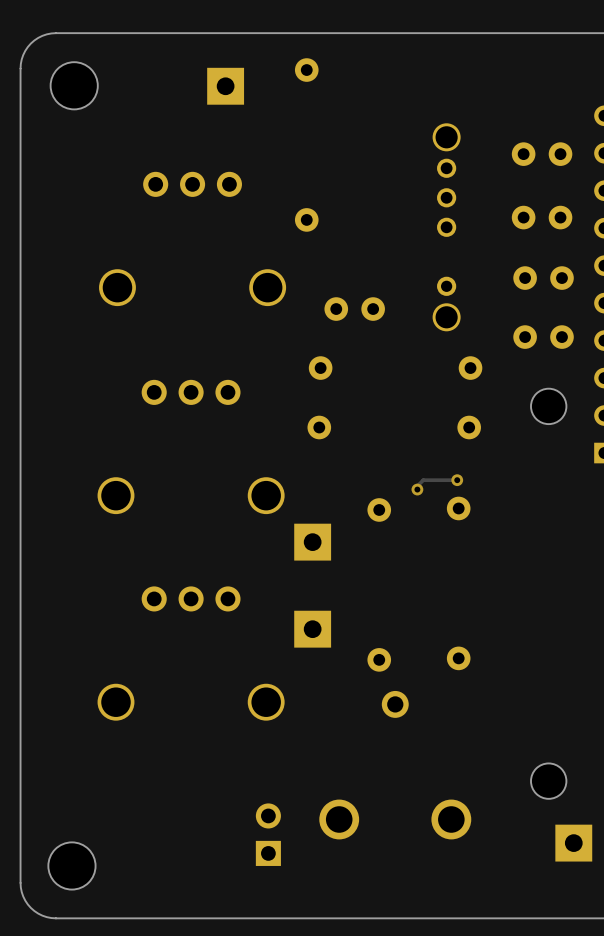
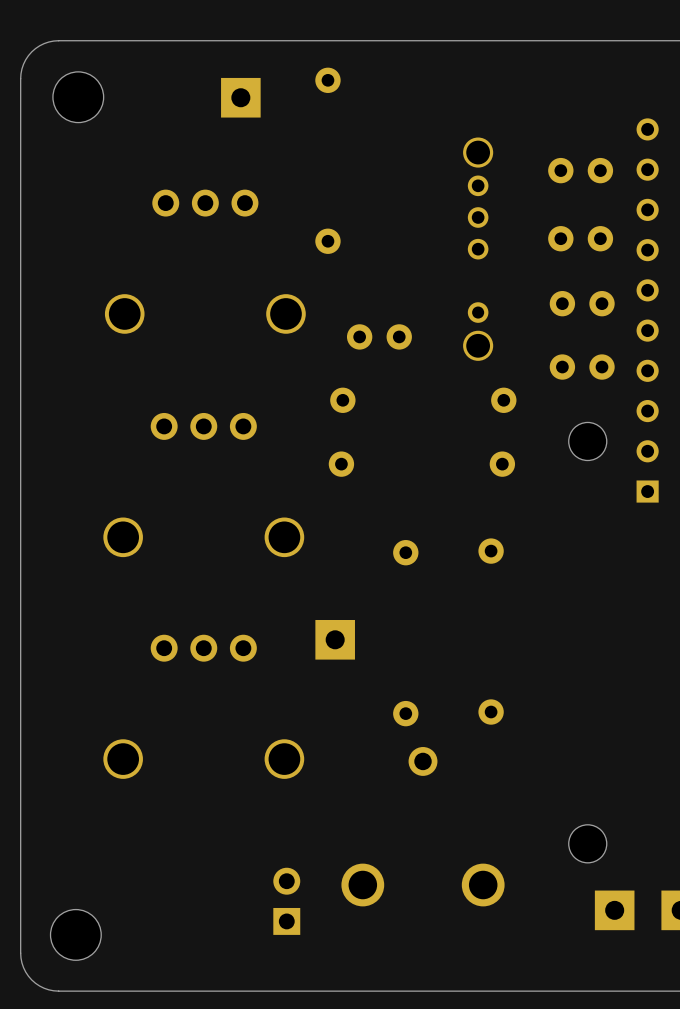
track: (457, 480) (423, 480) (417, 486) (417, 489) -> none
via: (457, 480) -> none
via: (417, 489) -> none
part: (312, 542) -> none
part: none -> (335, 639)
part: (312, 629) -> none

